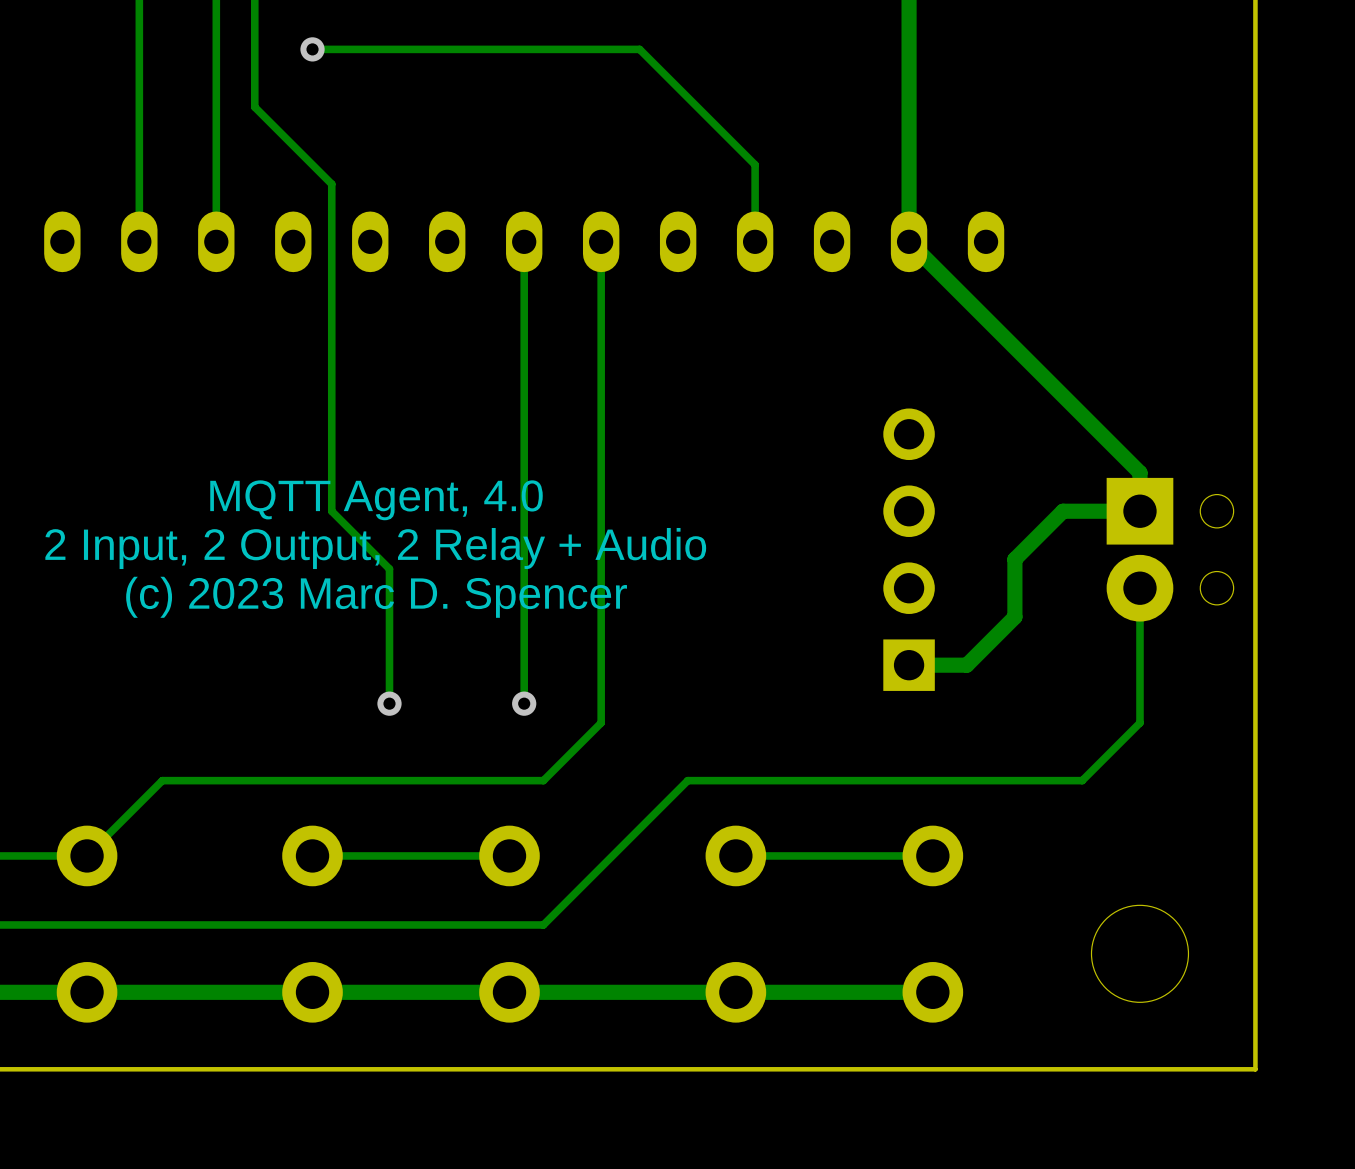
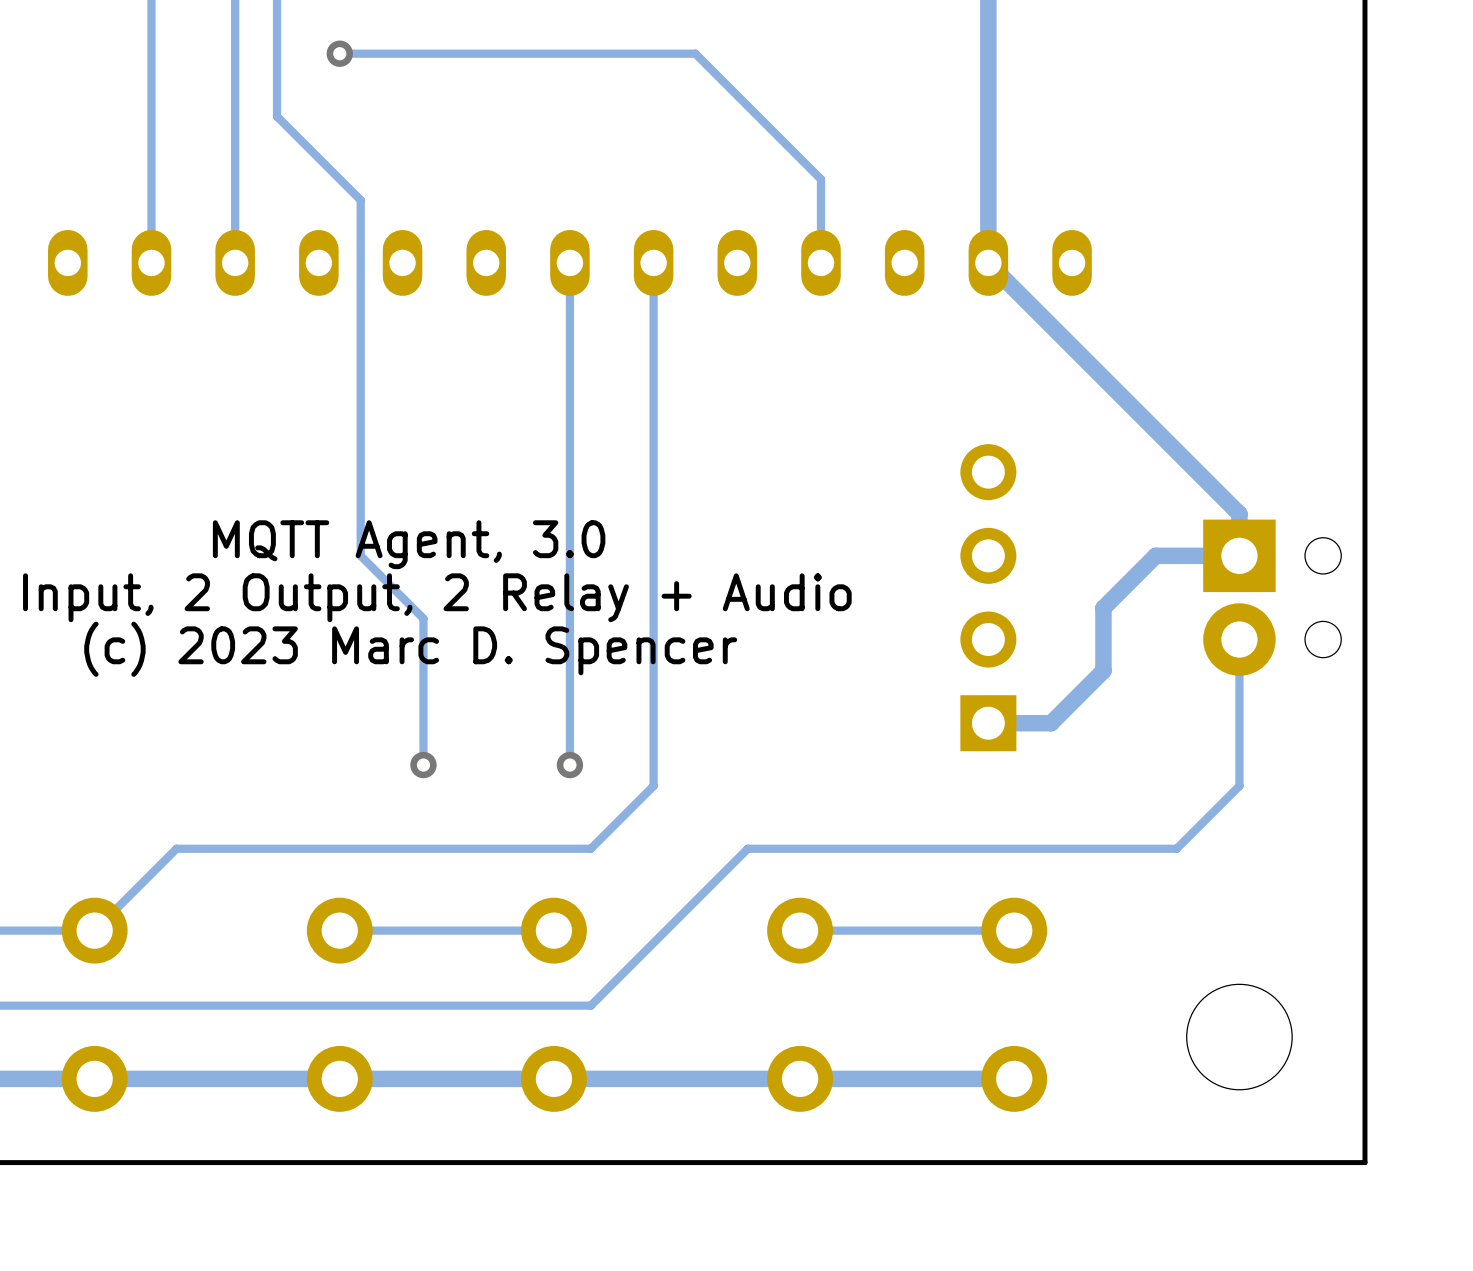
text: MQTT Agent, 4.0 (376, 500) -> MQTT Agent, 3.0 (409, 544)

